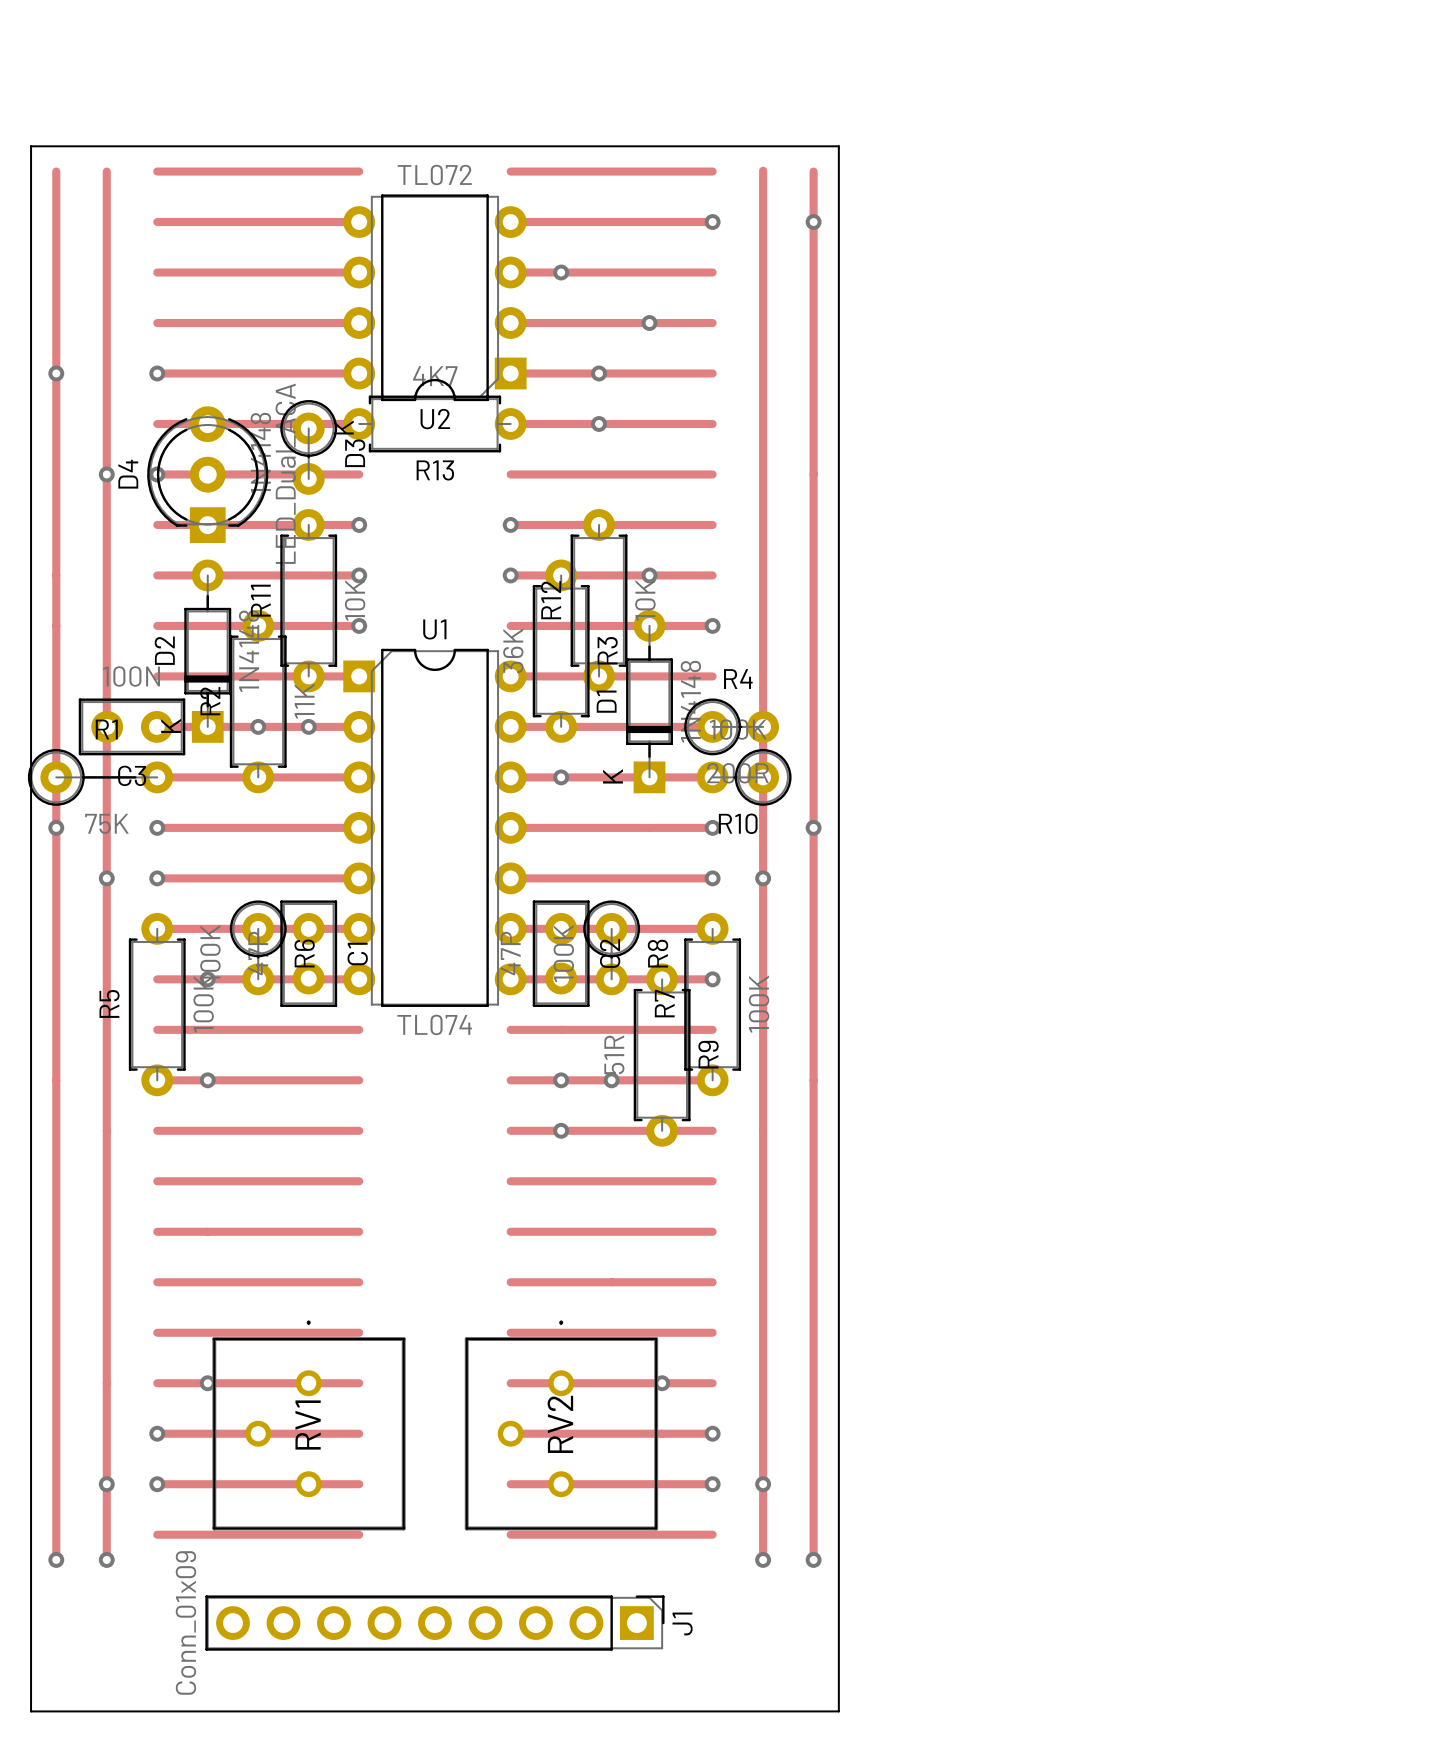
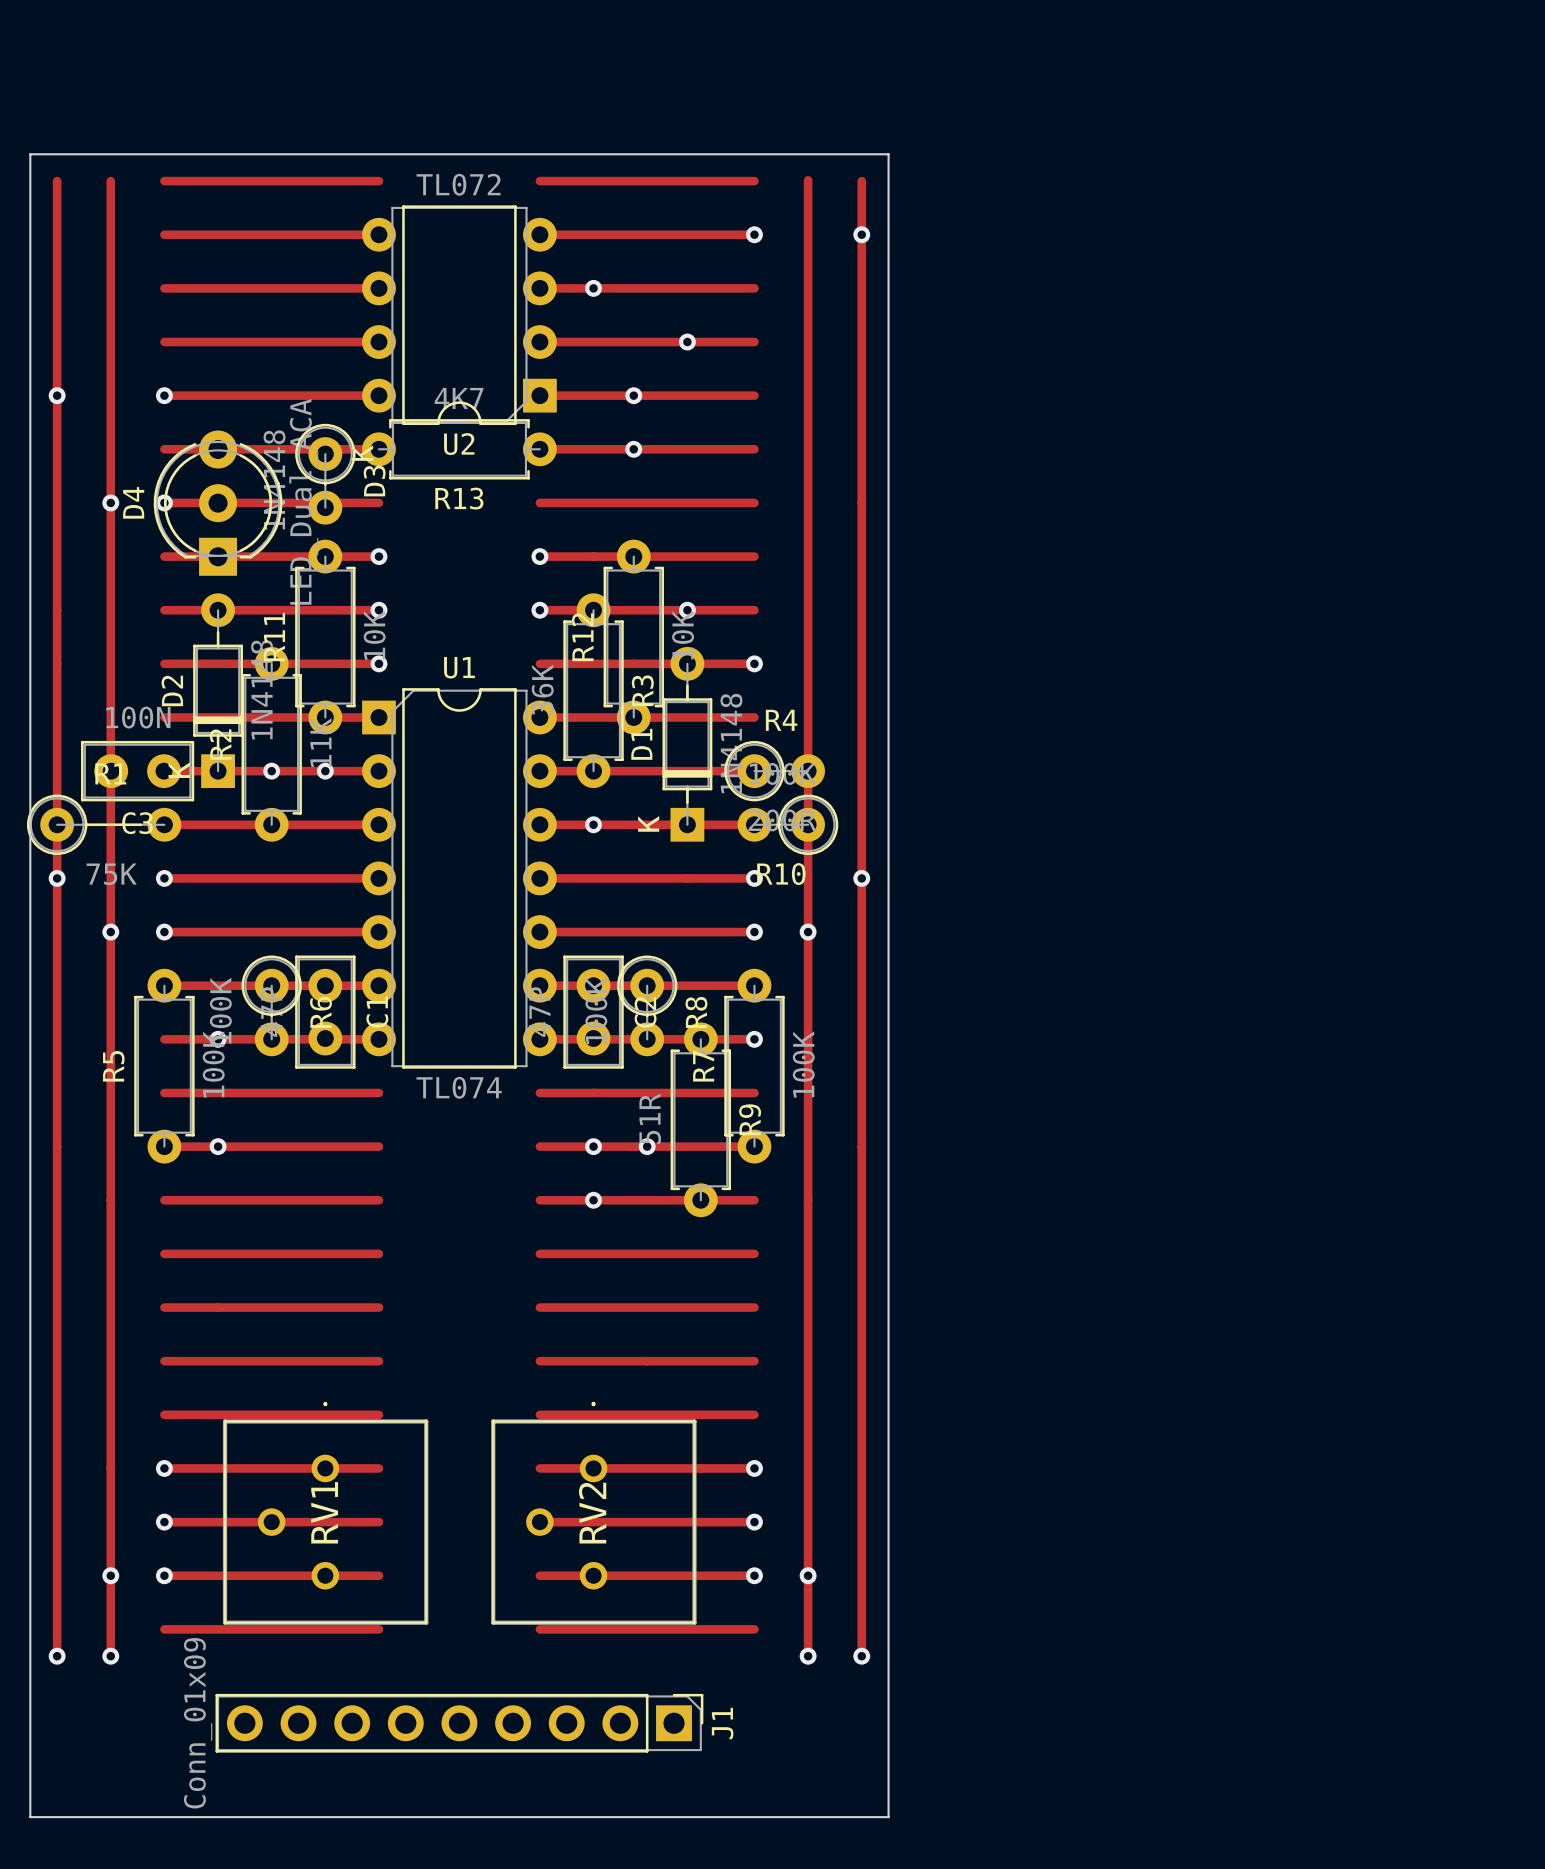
via position: (207, 1383) -> (164, 1468)
via position: (662, 1383) -> (754, 1468)

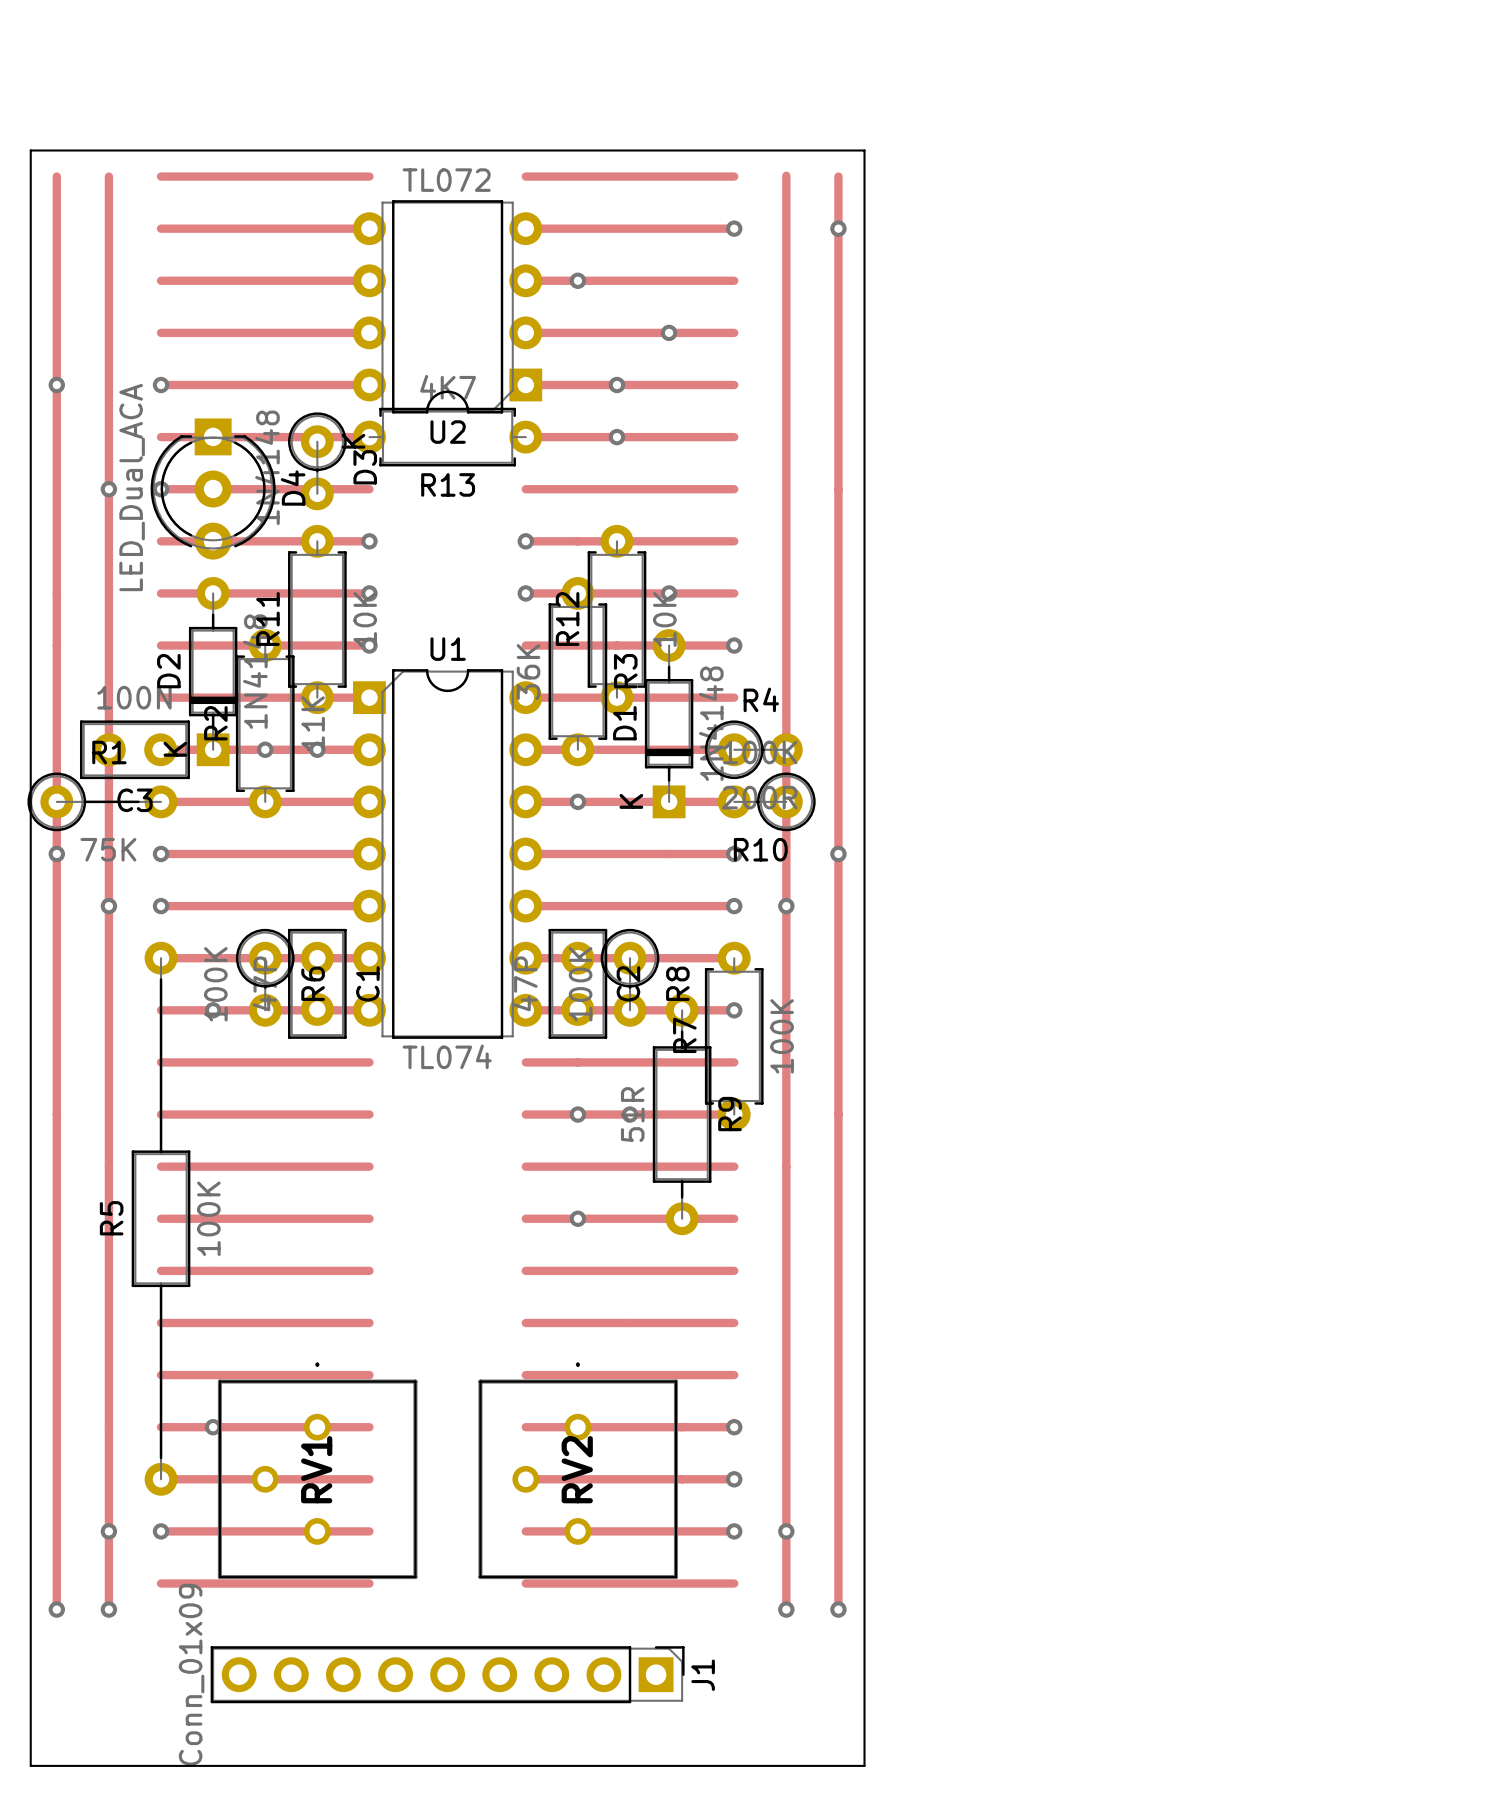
D4 rotation: 0° (218, 503) -> 180° (213, 489)
R5 footprint: [134, 968, 195, 1164] -> [131, 941, 191, 1496]
R9 footprint: [670, 1022, 732, 1218] -> [652, 993, 712, 1236]
via: (218, 1146) -> none
via position: (593, 1200) -> (577, 1218)
via: (164, 1468) -> none
via: none -> (213, 1427)
via: (164, 1522) -> none

